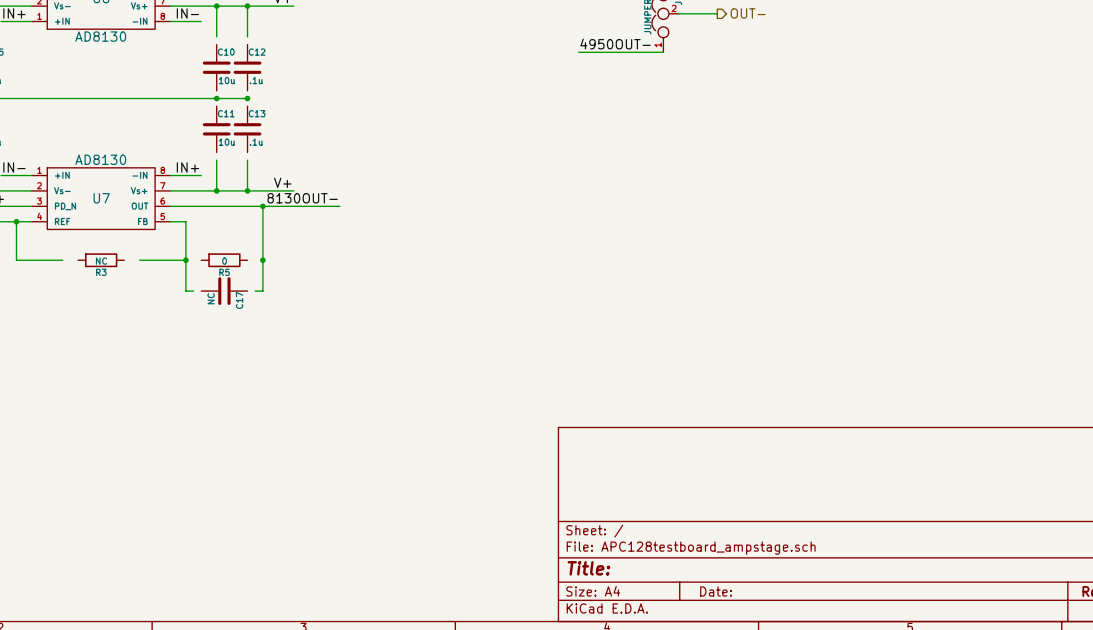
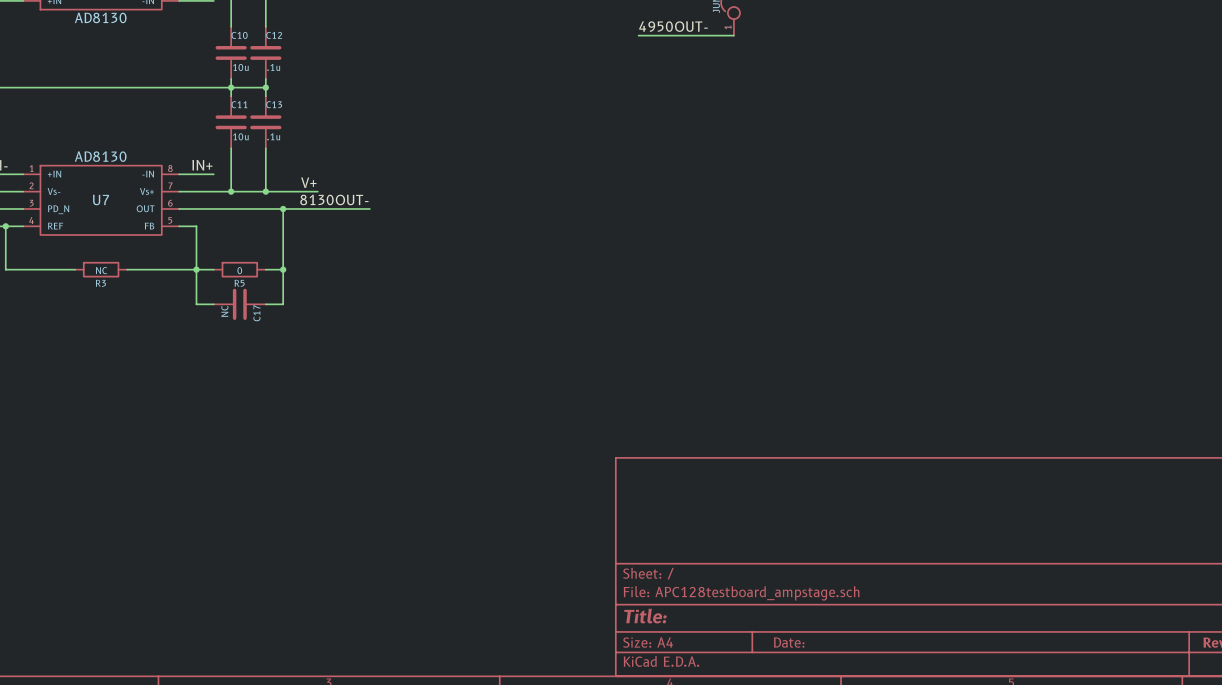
wire: none -> (231, 18) (231, 26)
wire: none -> (265, 18) (265, 26)
wire: none -> (231, 78) (231, 96)
wire: none -> (265, 78) (265, 96)
wire: none -> (231, 148) (231, 156)
wire: none -> (265, 148) (265, 156)
wire: none -> (57, 269) (75, 269)
wire: none -> (127, 269) (144, 269)
wire: none -> (196, 269) (213, 269)
wire: none -> (265, 269) (283, 269)
wire: none -> (205, 304) (213, 304)
wire: none -> (265, 304) (274, 304)

